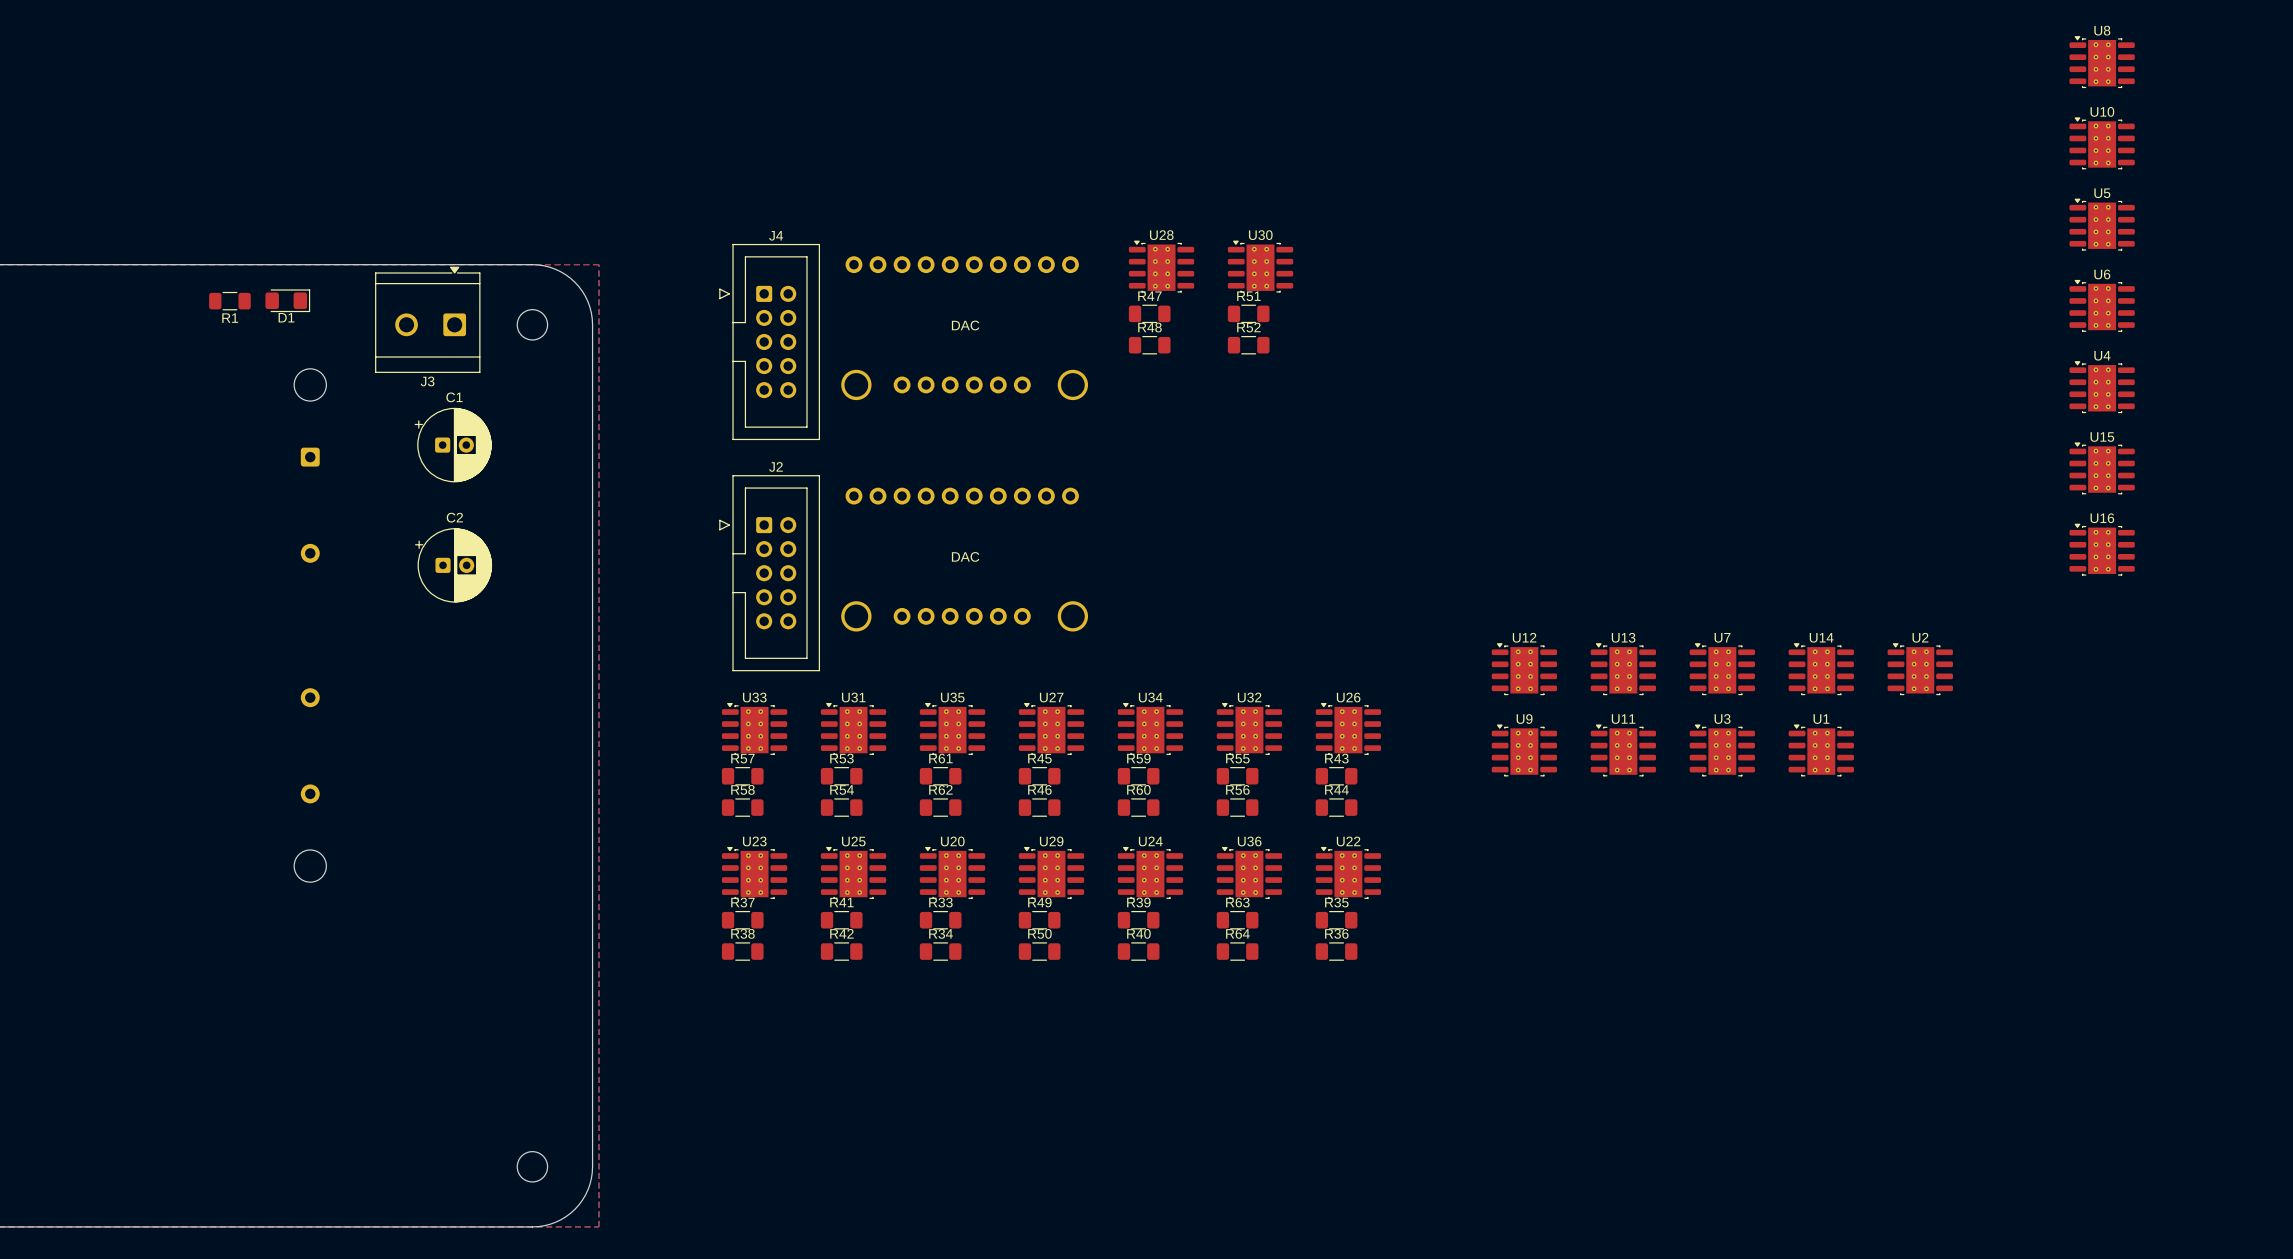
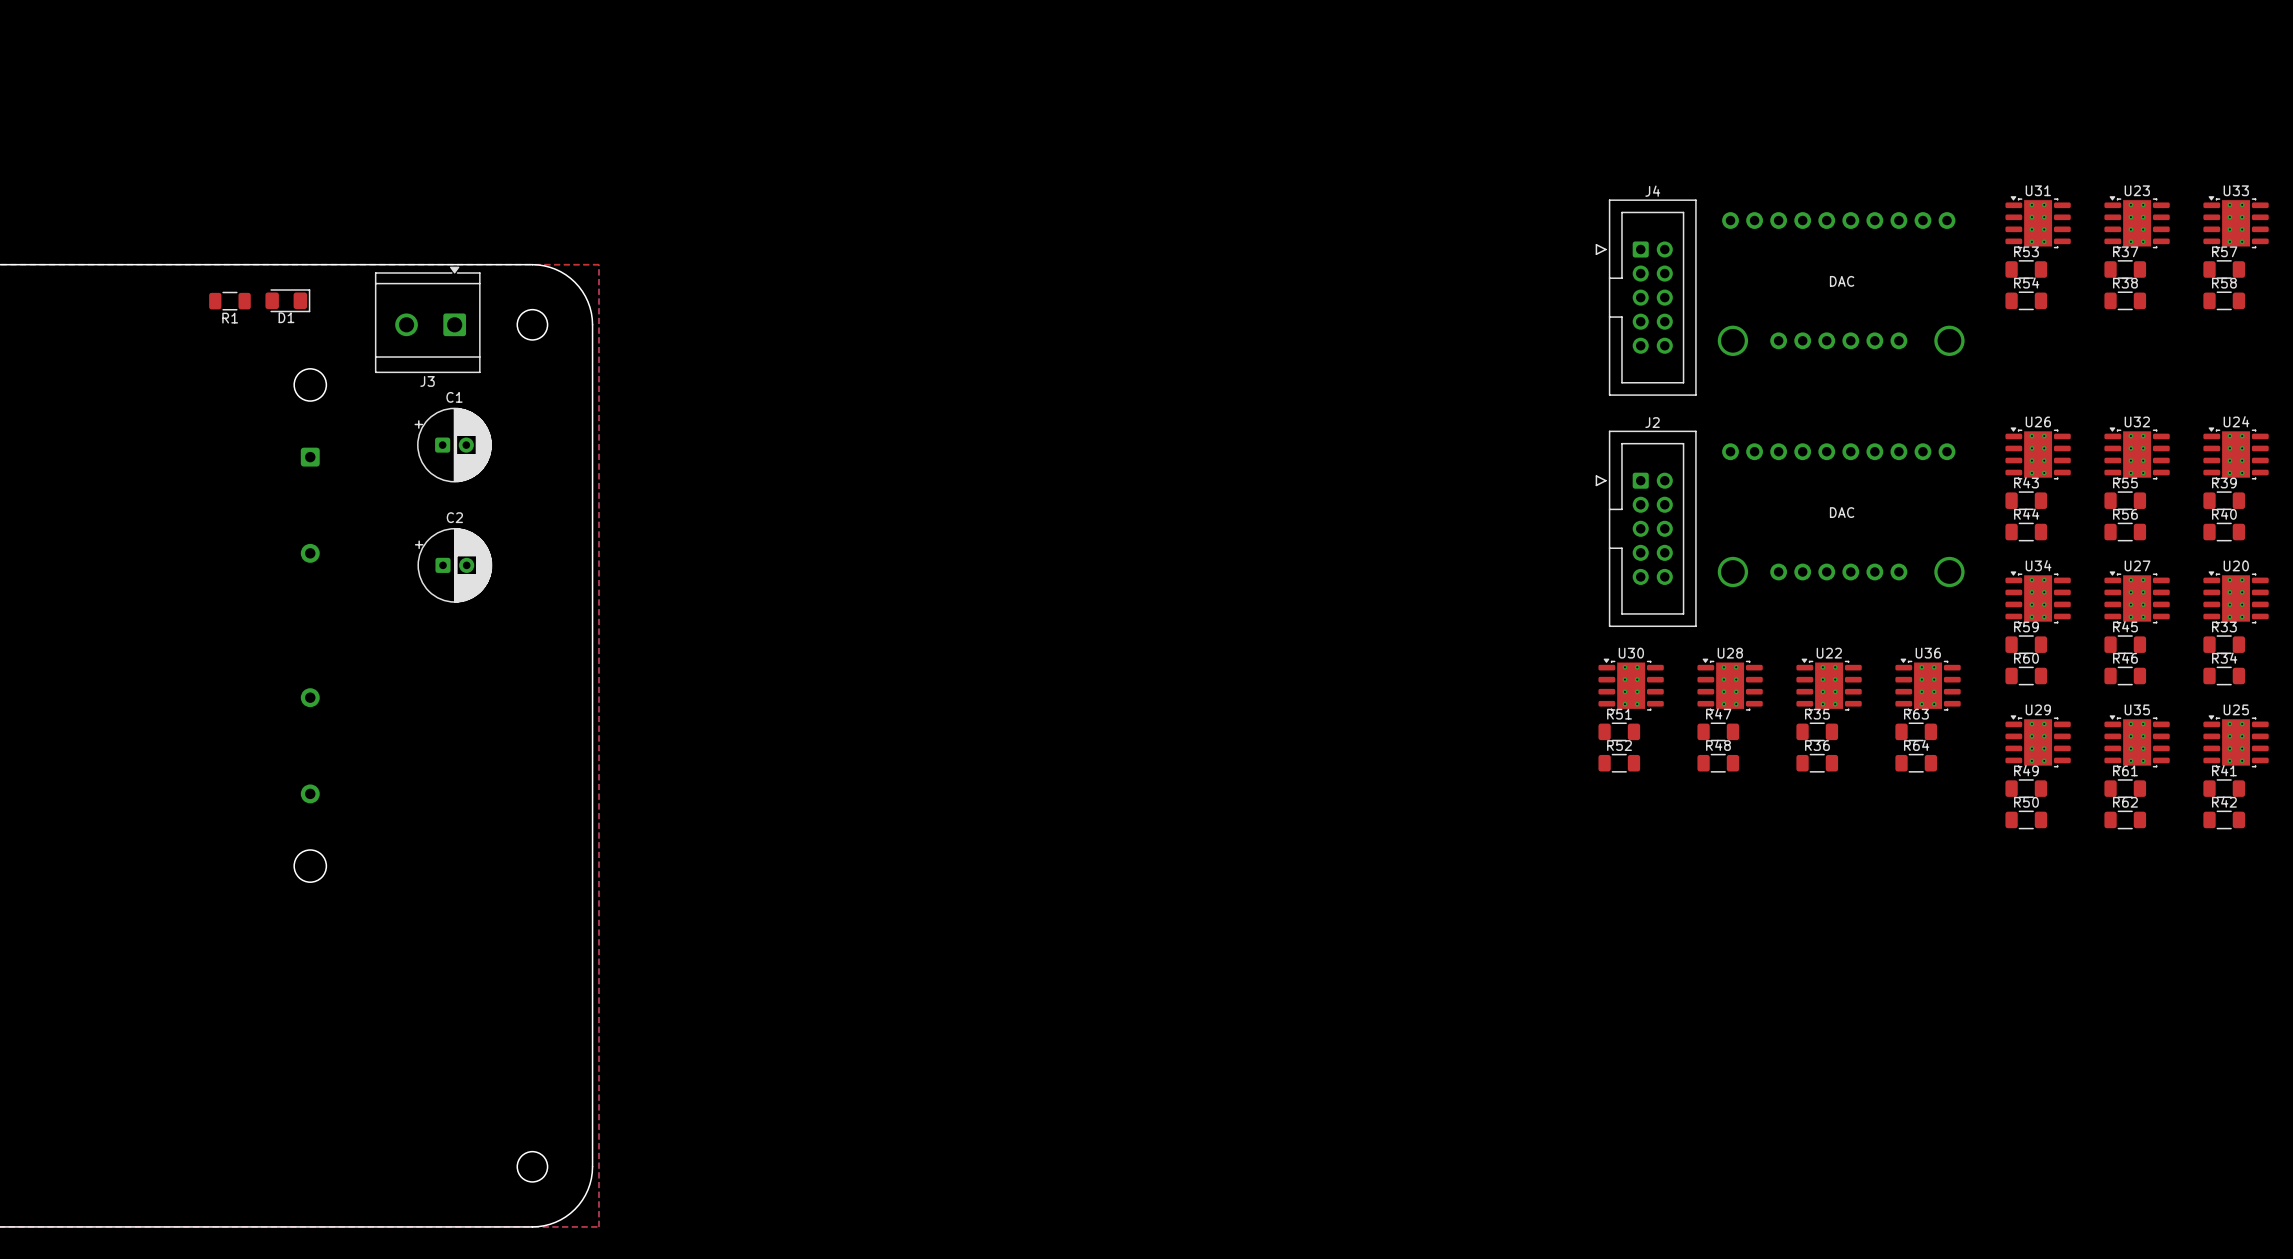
U8: (2102, 62) -> none
U10: (2102, 143) -> none
U5: (2102, 224) -> none
U28 position: (1161, 266) -> (1730, 684)
U30 position: (1260, 266) -> (1631, 684)
part: none -> DAC (1841, 284)
U6: (2102, 305) -> none
R47 position: (1149, 313) -> (1718, 731)
R51 position: (1248, 313) -> (1619, 731)
part: DAC (964, 328) -> none
J4 position: (769, 341) -> (1646, 297)
R48 position: (1149, 345) -> (1718, 763)
R52 position: (1248, 345) -> (1619, 763)
U4: (2102, 387) -> none
U15: (2102, 468) -> none
part: none -> DAC (1841, 515)
U16: (2102, 549) -> none
part: DAC (964, 559) -> none
J2 position: (769, 573) -> (1646, 528)
U12: (1524, 669) -> none
U13: (1623, 669) -> none
U7: (1722, 669) -> none
U14: (1821, 669) -> none
U2: (1920, 669) -> none
U33 position: (754, 728) -> (2236, 222)
U31 position: (853, 728) -> (2038, 222)
U35 position: (952, 728) -> (2137, 741)
U27 position: (1051, 728) -> (2137, 597)
U34 position: (1150, 728) -> (2038, 597)
U32 position: (1249, 728) -> (2137, 453)
U26 position: (1348, 728) -> (2038, 453)
U9: (1524, 750) -> none
U11: (1623, 750) -> none
U3: (1722, 750) -> none
U1: (1821, 750) -> none
R57 position: (742, 776) -> (2224, 269)
R53 position: (841, 776) -> (2026, 269)
R61 position: (940, 776) -> (2125, 788)
R45 position: (1039, 776) -> (2125, 644)
R59 position: (1138, 776) -> (2026, 644)
R55 position: (1237, 776) -> (2125, 500)
R43 position: (1336, 776) -> (2026, 500)
R58 position: (742, 807) -> (2224, 300)
R54 position: (841, 807) -> (2026, 300)
R62 position: (940, 807) -> (2125, 819)
R46 position: (1039, 807) -> (2125, 675)
R60 position: (1138, 807) -> (2026, 675)
R56 position: (1237, 807) -> (2125, 532)
R44 position: (1336, 807) -> (2026, 532)
U23 position: (754, 872) -> (2137, 222)
U25 position: (853, 872) -> (2236, 741)
U20 position: (952, 872) -> (2236, 597)
U29 position: (1051, 872) -> (2038, 741)
U24 position: (1150, 872) -> (2236, 453)
U36 position: (1249, 872) -> (1928, 684)
U22 position: (1348, 872) -> (1829, 684)
R37 position: (742, 920) -> (2125, 269)
R41 position: (841, 920) -> (2224, 788)
R33 position: (940, 920) -> (2224, 644)
R49 position: (1039, 920) -> (2026, 788)
R39 position: (1138, 920) -> (2224, 500)
R63 position: (1237, 920) -> (1916, 731)
R35 position: (1336, 920) -> (1817, 731)
R38 position: (742, 951) -> (2125, 300)
R42 position: (841, 951) -> (2224, 819)
R34 position: (940, 951) -> (2224, 675)
R50 position: (1039, 951) -> (2026, 819)
R40 position: (1138, 951) -> (2224, 532)
R64 position: (1237, 951) -> (1916, 763)
R36 position: (1336, 951) -> (1817, 763)

